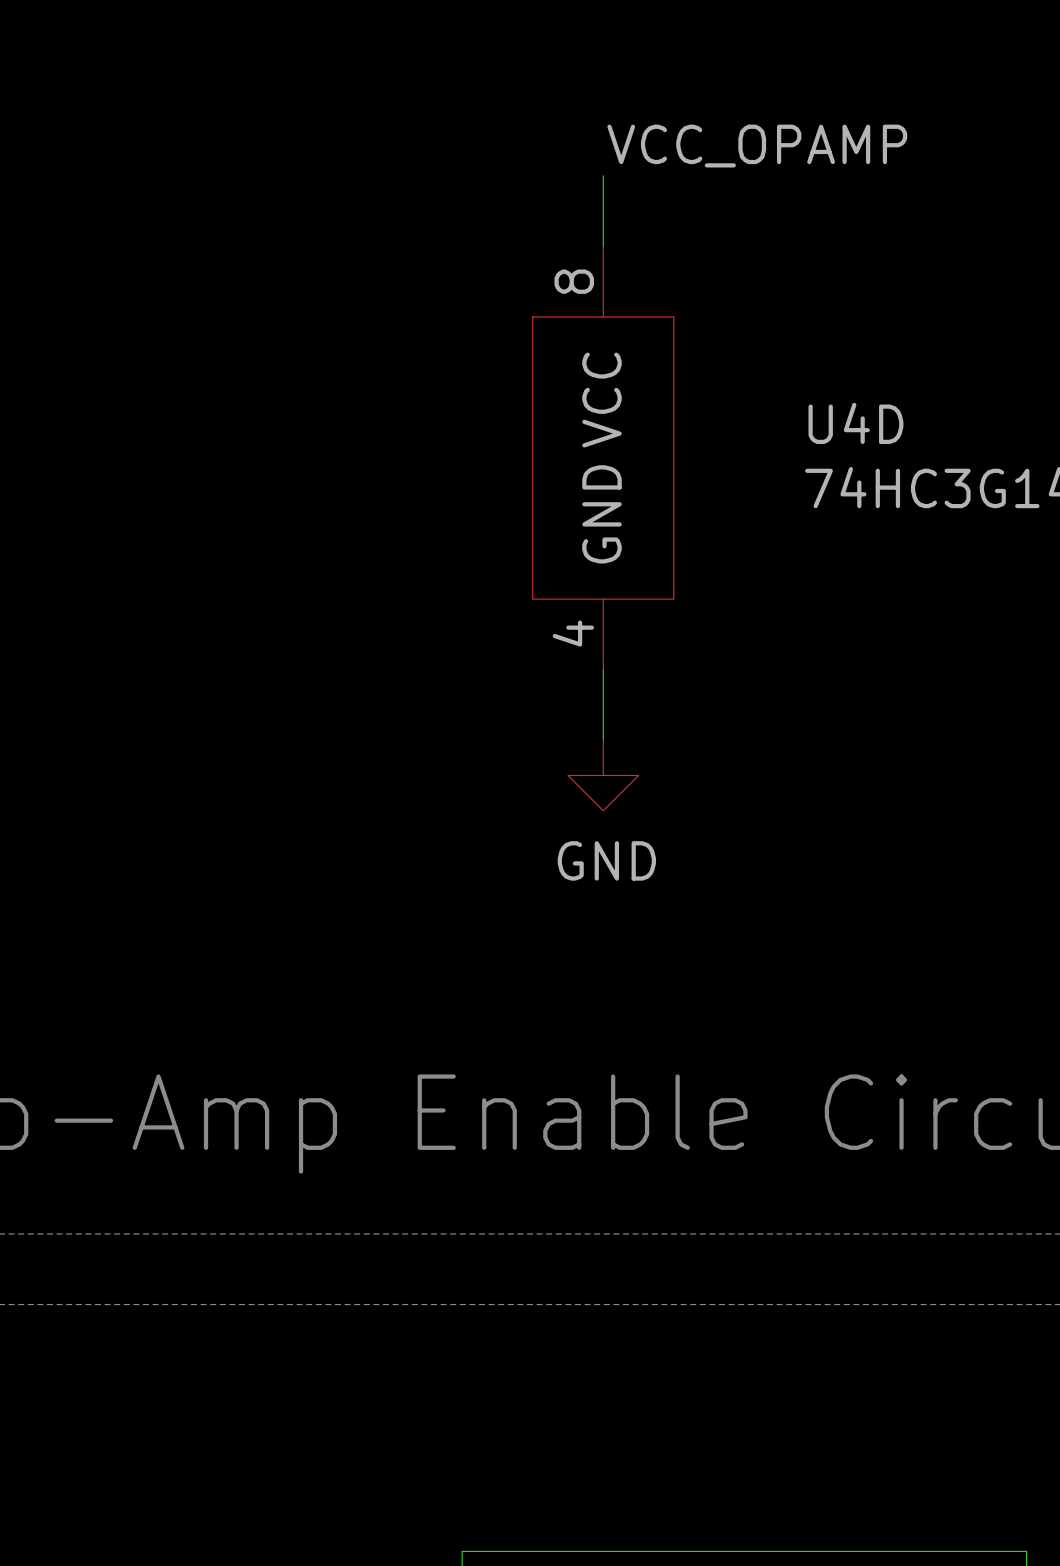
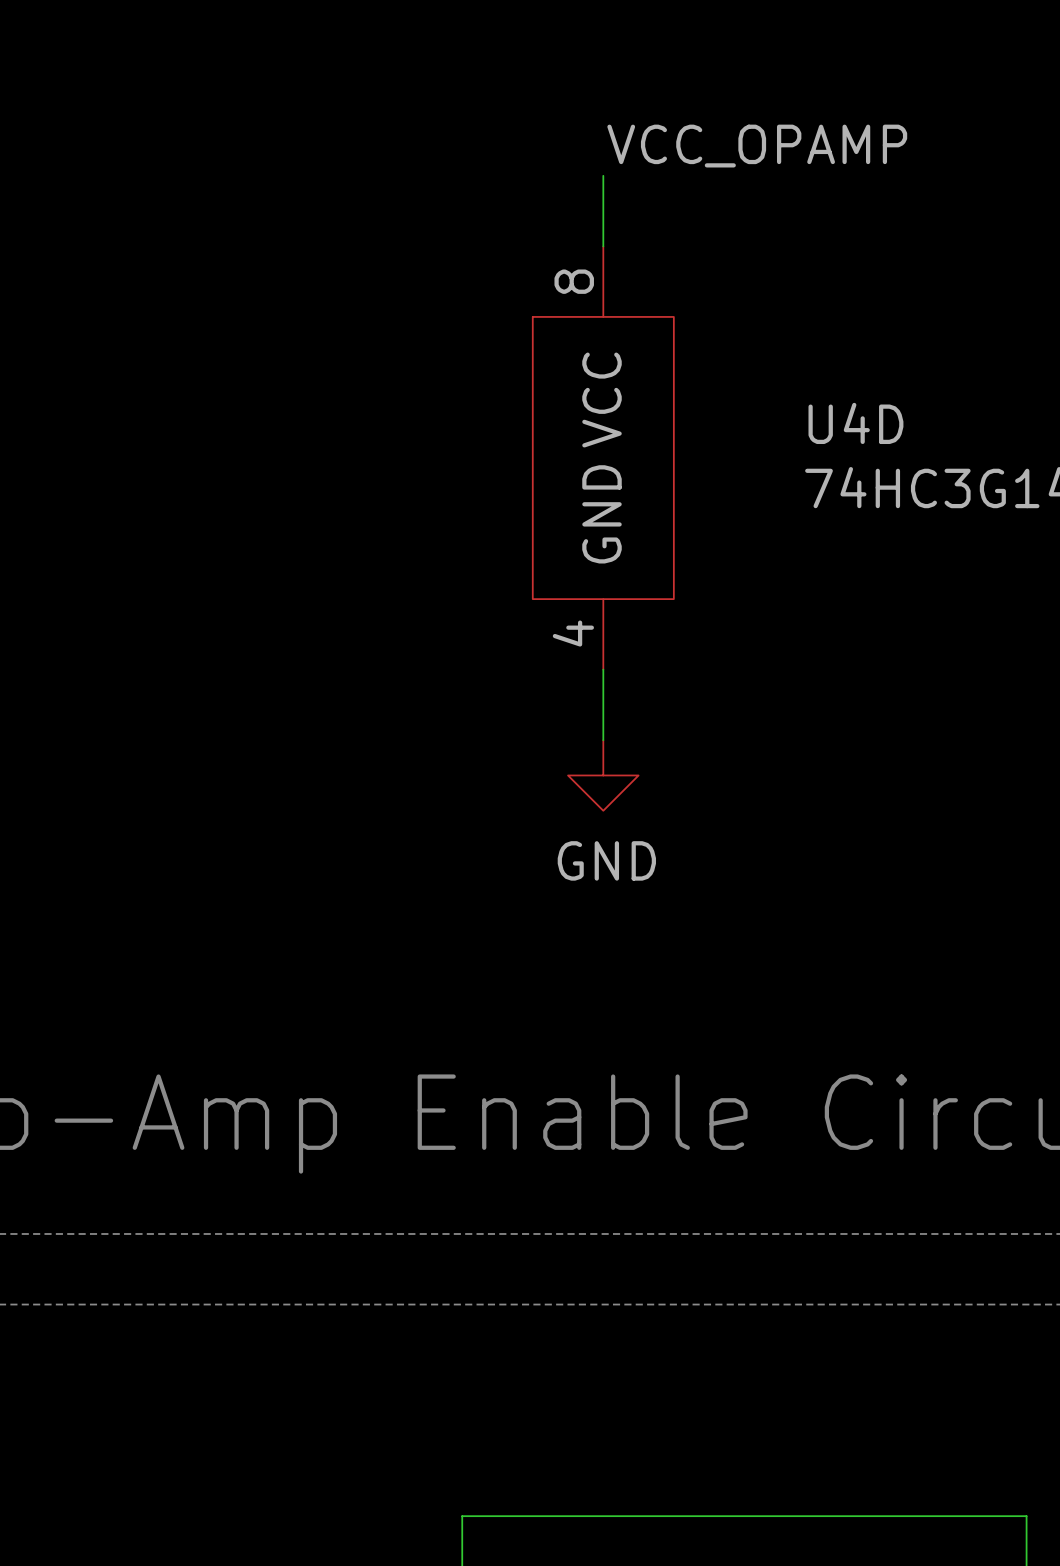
wire: (462, 1551) (1026, 1551) -> (462, 1551) (462, 1516) (1026, 1516) (1026, 1551)

